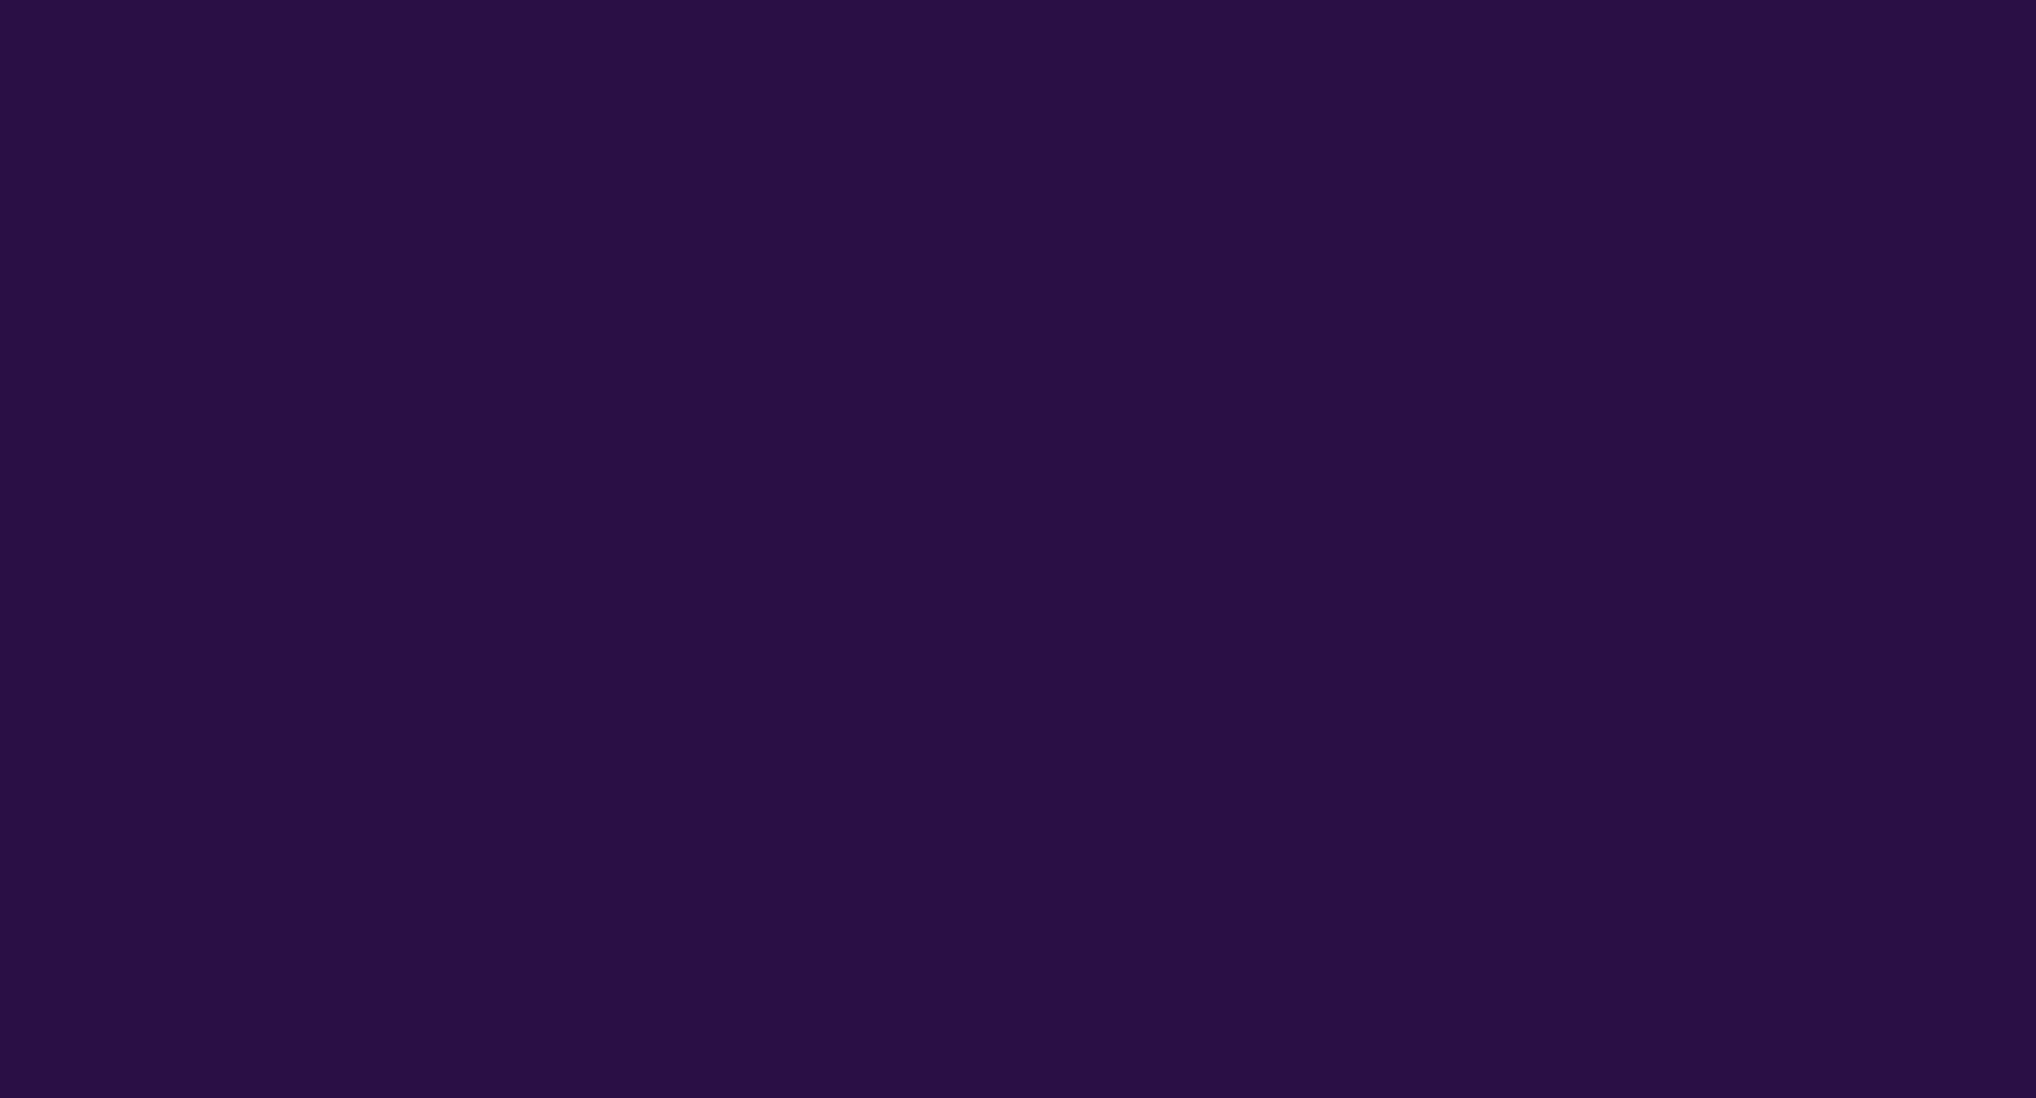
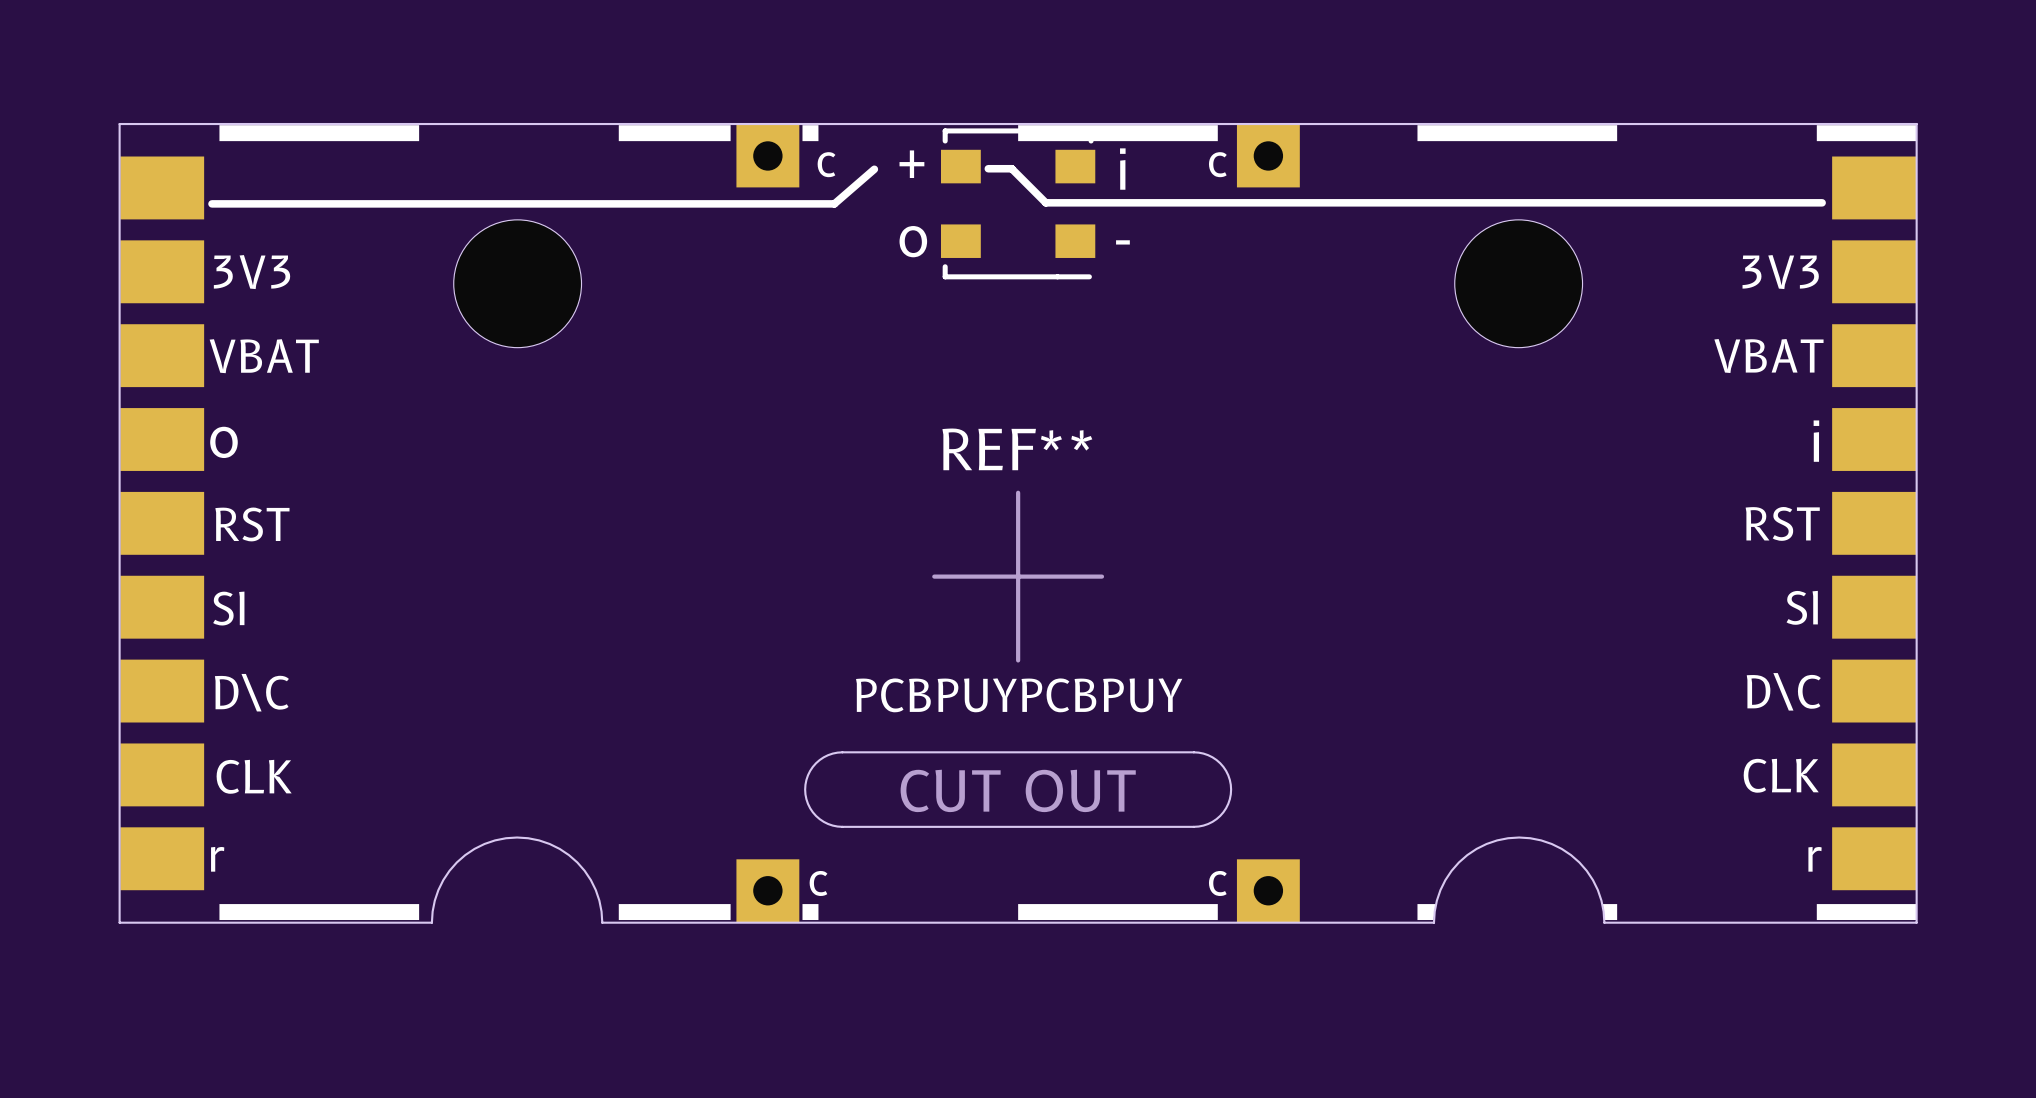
board edge: none -> (119, 124) (1916, 124) (1916, 922) (1604, 922) (1597, 890) (1579, 862) (1551, 843) (1519, 837) (1486, 843) (1458, 862) (1440, 890) (1433, 922) (602, 922) (595, 890) (577, 862) (549, 843) (517, 837) (484, 843) (456, 862) (438, 890) (431, 922) (119, 922) (119, 124)
drawing: none -> [219, 125, 420, 142]
drawing: none -> [618, 125, 731, 142]
drawing: none -> [802, 125, 819, 142]
drawing: none -> [1018, 125, 1218, 142]
drawing: none -> [1417, 125, 1618, 142]
drawing: none -> [1816, 125, 1917, 142]
part: none -> (767, 155)
part: none -> (1268, 155)
text: none -> c (826, 164)
text: none -> c (1217, 164)
line: none -> (988, 168) (1011, 168) (1045, 202) (1822, 202)
line: none -> (874, 169) (834, 203) (211, 203)
part: none -> (1018, 203)
text: none -> 3V3 (252, 272)
text: none -> 3V3 (1780, 272)
text: none -> VBAT (264, 356)
text: none -> VBAT (1768, 356)
text: none -> i (1816, 441)
REF**: none -> (1018, 441)
text: none -> o (223, 442)
part: none -> (162, 523)
text: none -> RST (1782, 523)
part: none -> (1874, 523)
text: none -> RST (252, 524)
text: none -> SI (1802, 607)
text: none -> SI (228, 608)
text: none -> D\C (1783, 691)
text: none -> D\C (251, 692)
text: none -> PCBPUYPCBPUY (1019, 695)
board edge: none -> (842, 752) (1198, 752) (1212, 757) (1223, 766) (1229, 779) (1230, 794) (1226, 808) (1220, 815) (1212, 821) (1198, 826) (837, 826) (823, 821) (812, 812) (806, 799) (805, 784) (810, 770) (819, 760) (828, 755) (842, 752)
text: none -> CLK (1781, 775)
text: none -> CLK (254, 776)
text: none -> CUT OUT (1018, 790)
text: none -> r (217, 859)
text: none -> r (1815, 859)
text: none -> c (818, 883)
text: none -> c (1217, 883)
part: none -> (767, 890)
part: none -> (1268, 890)
drawing: none -> [219, 904, 420, 921]
drawing: none -> [618, 904, 731, 921]
drawing: none -> [802, 904, 819, 921]
drawing: none -> [1018, 904, 1218, 921]
drawing: none -> [1417, 904, 1436, 921]
drawing: none -> [1602, 904, 1618, 921]
drawing: none -> [1816, 904, 1917, 921]

